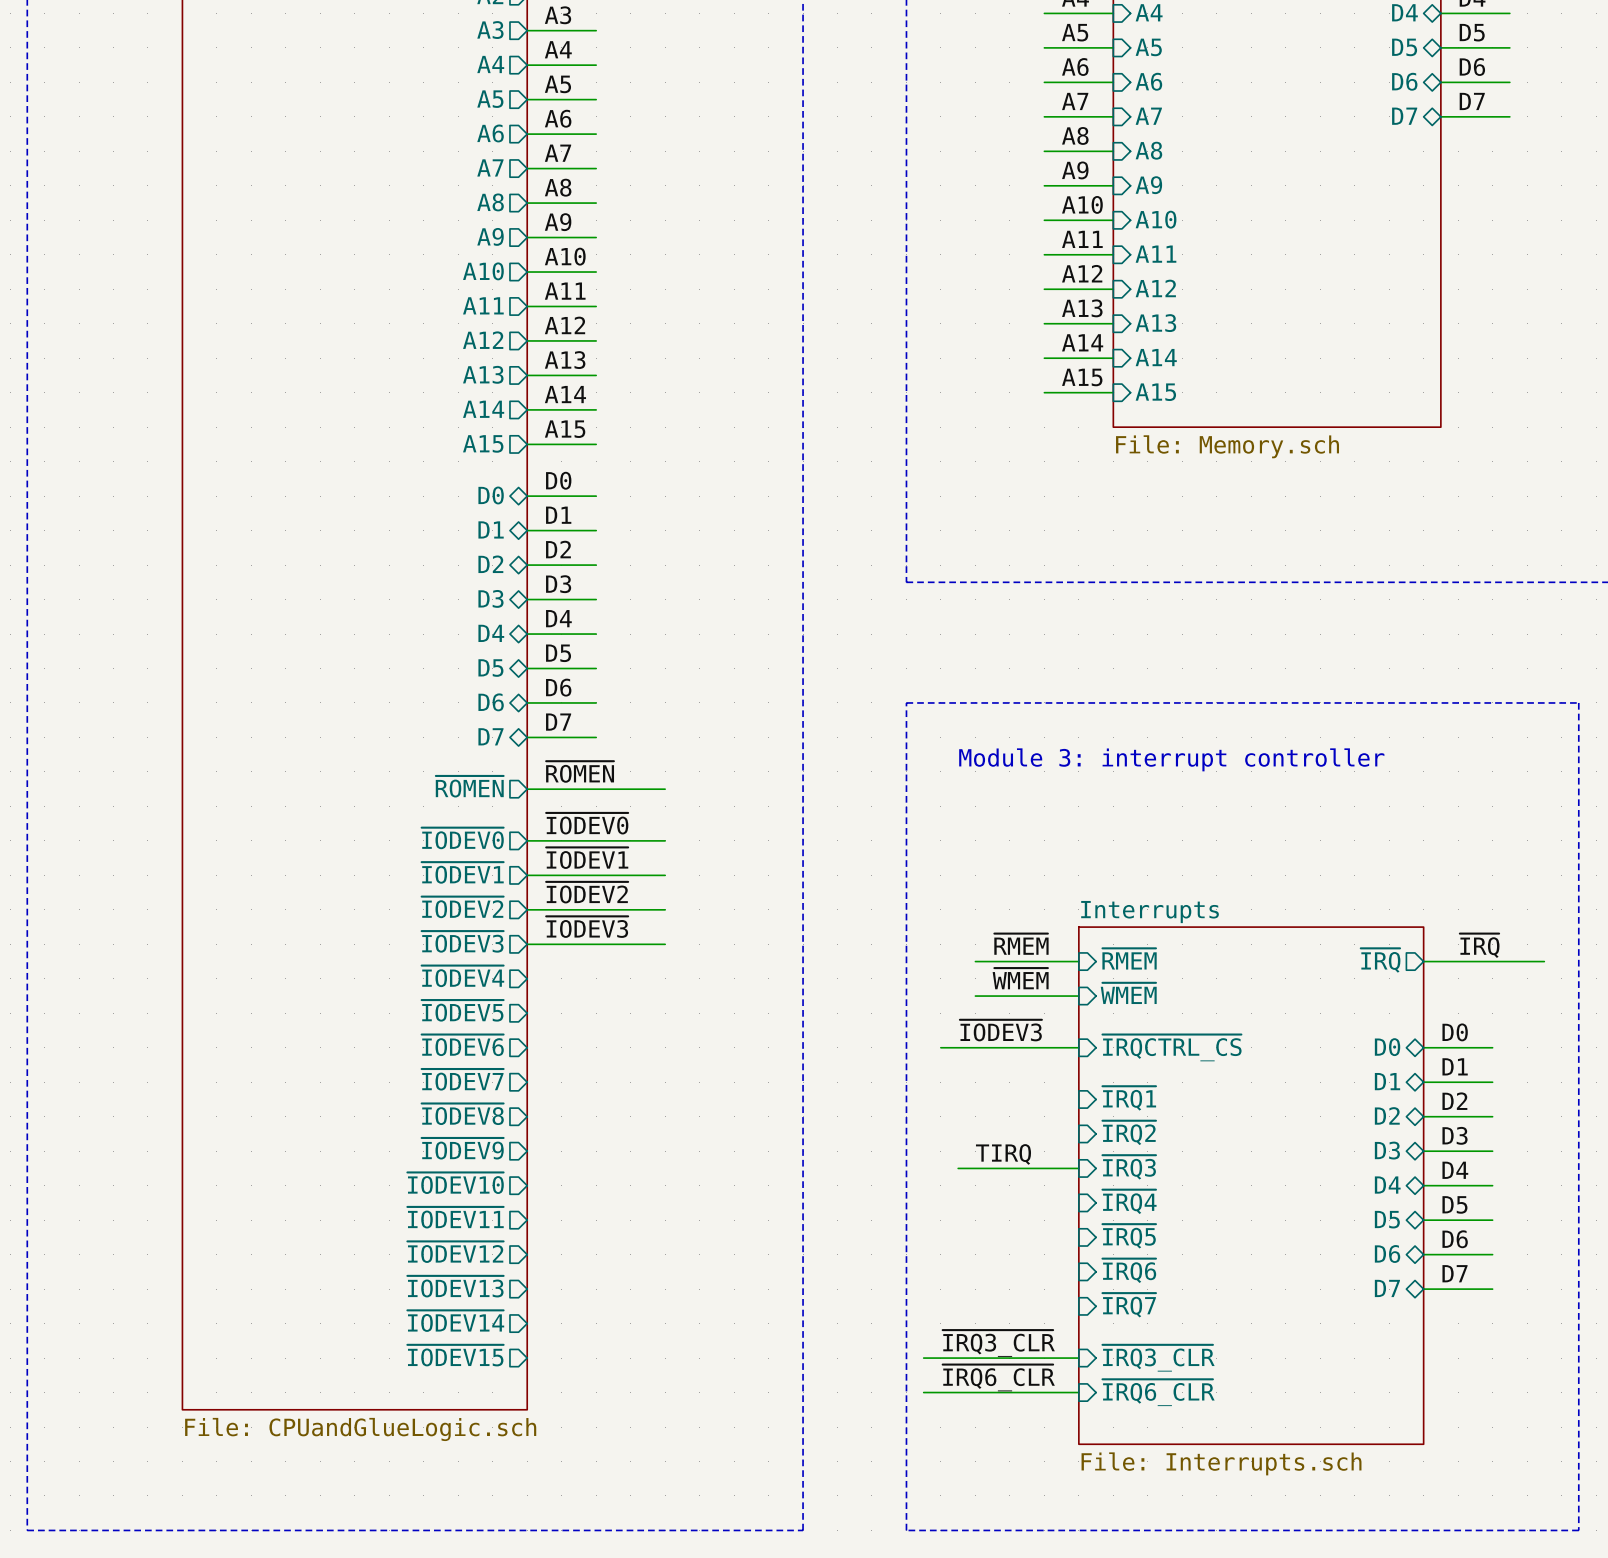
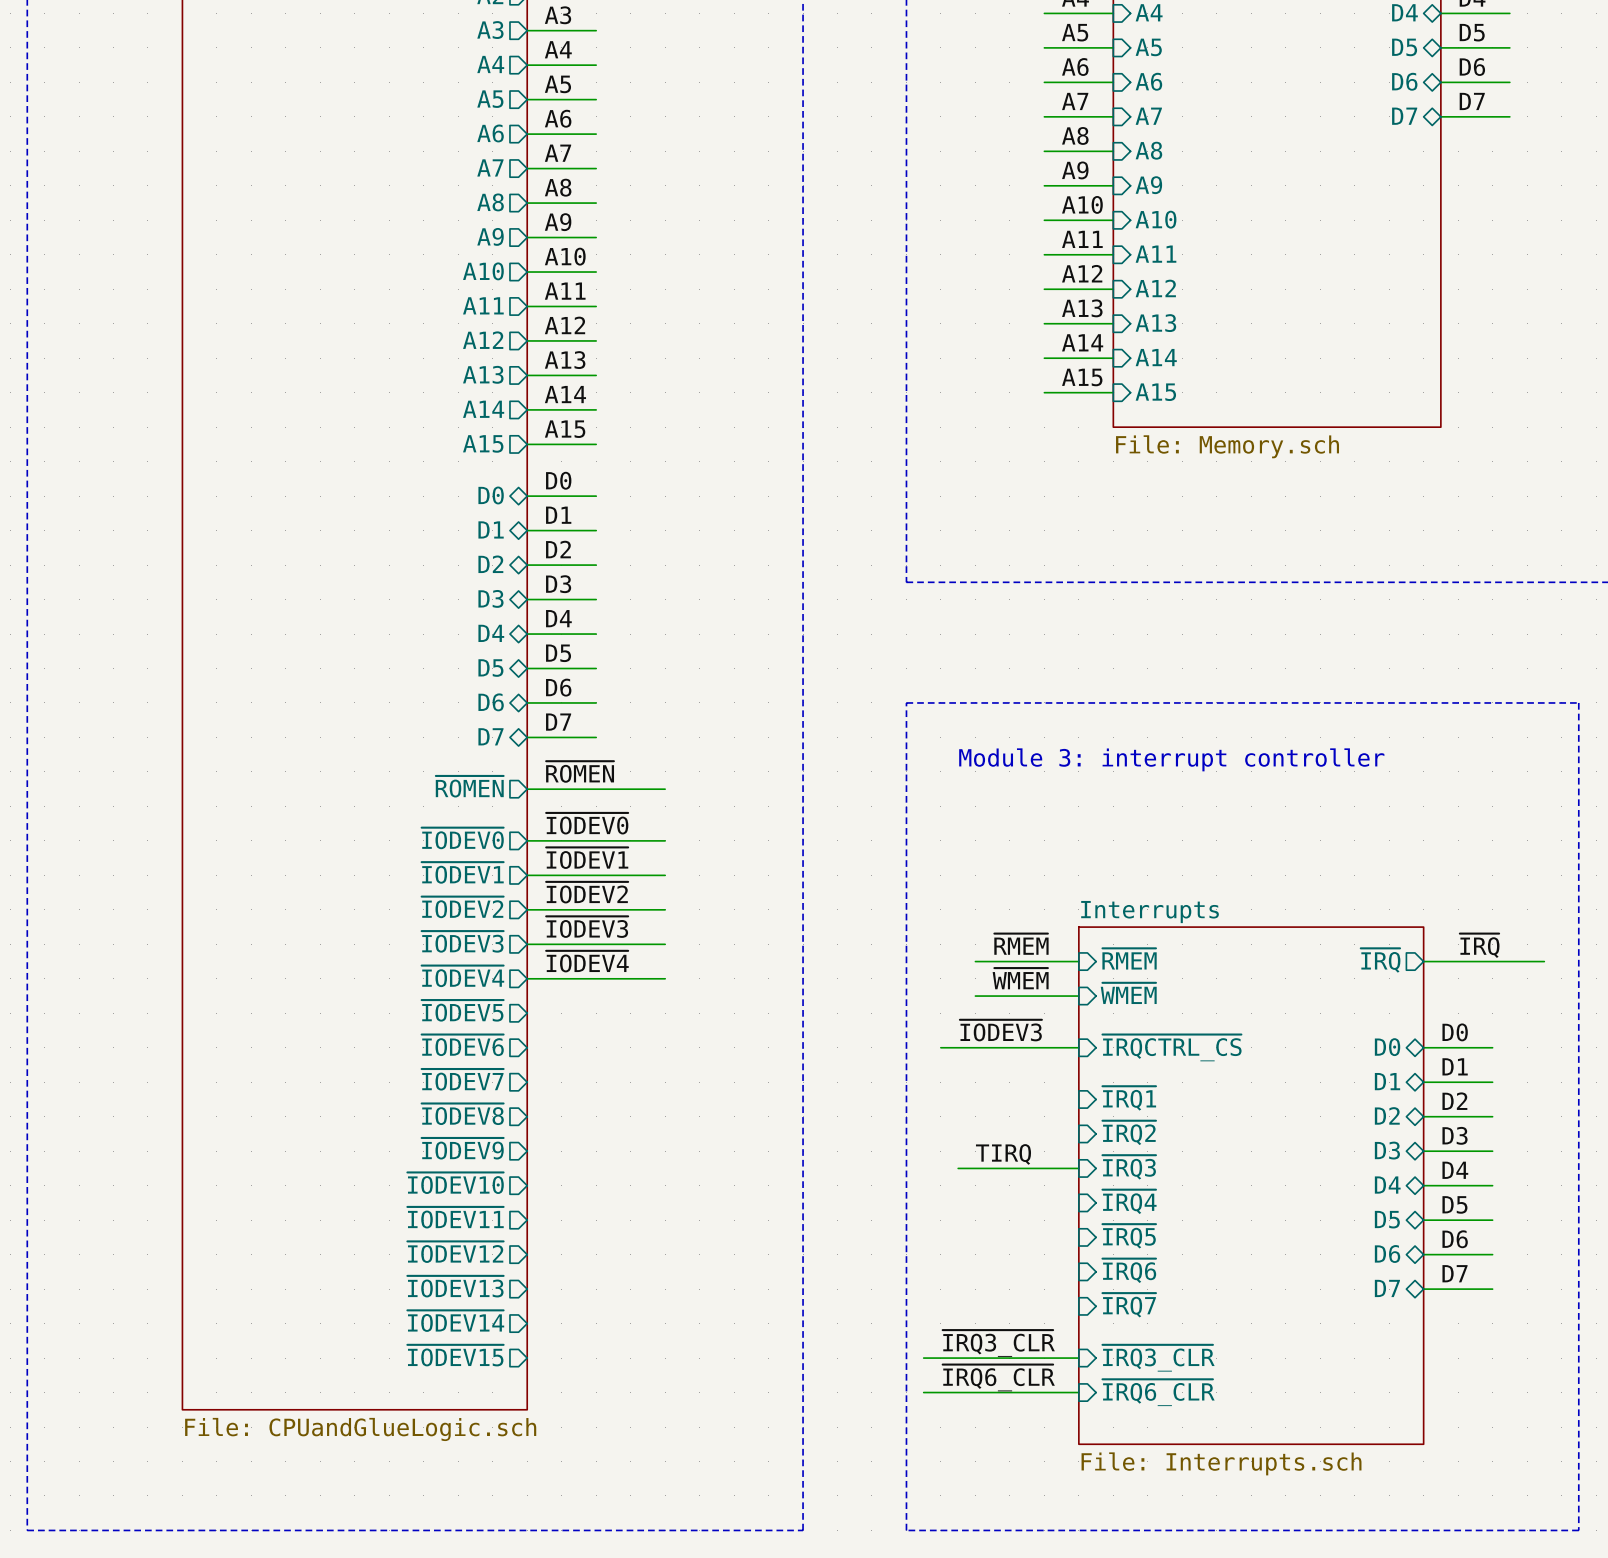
label: none -> ~{IODEV4} (587, 961)
wire: none -> (527, 978) (665, 978)

